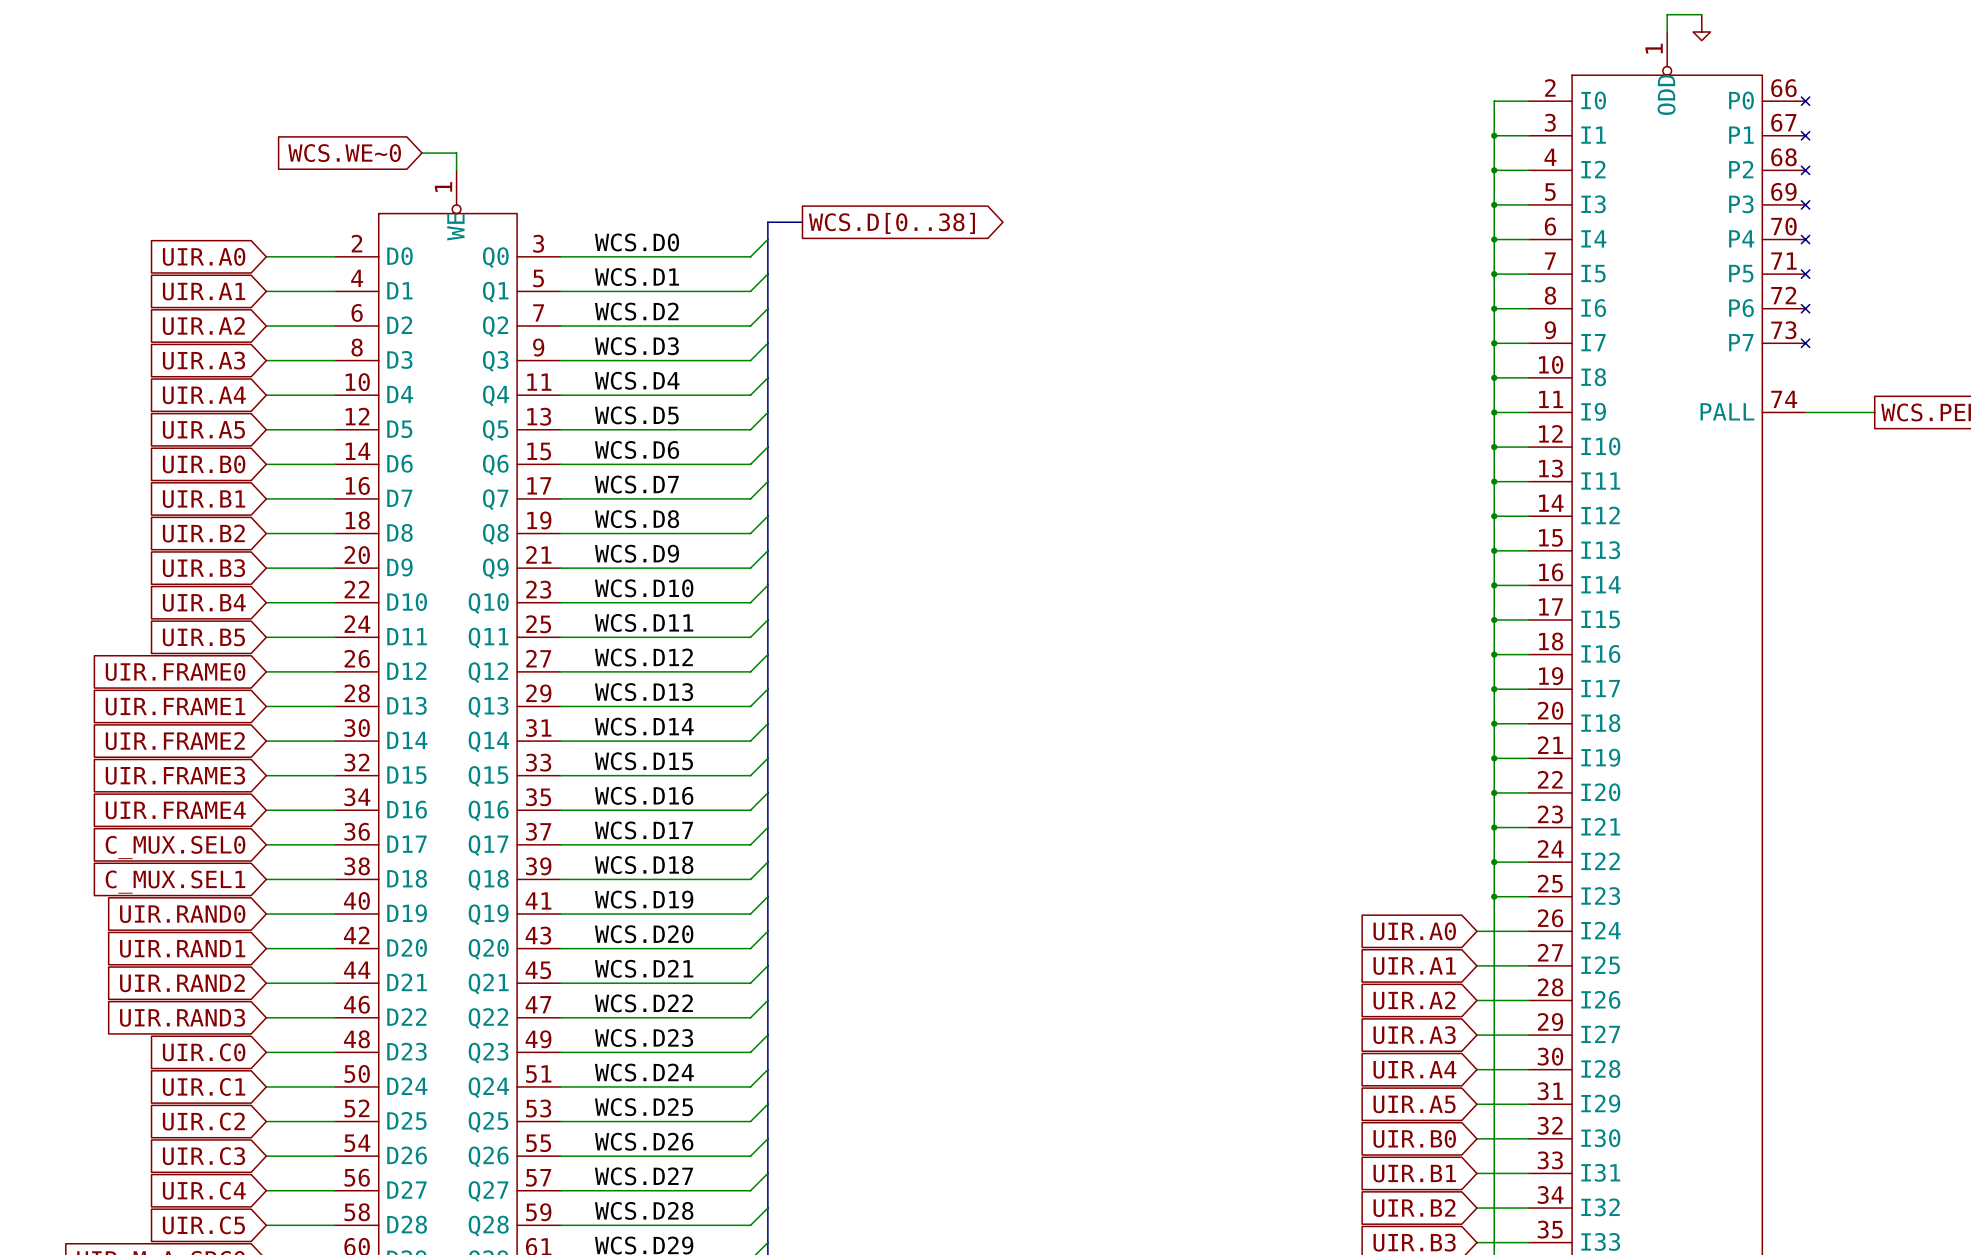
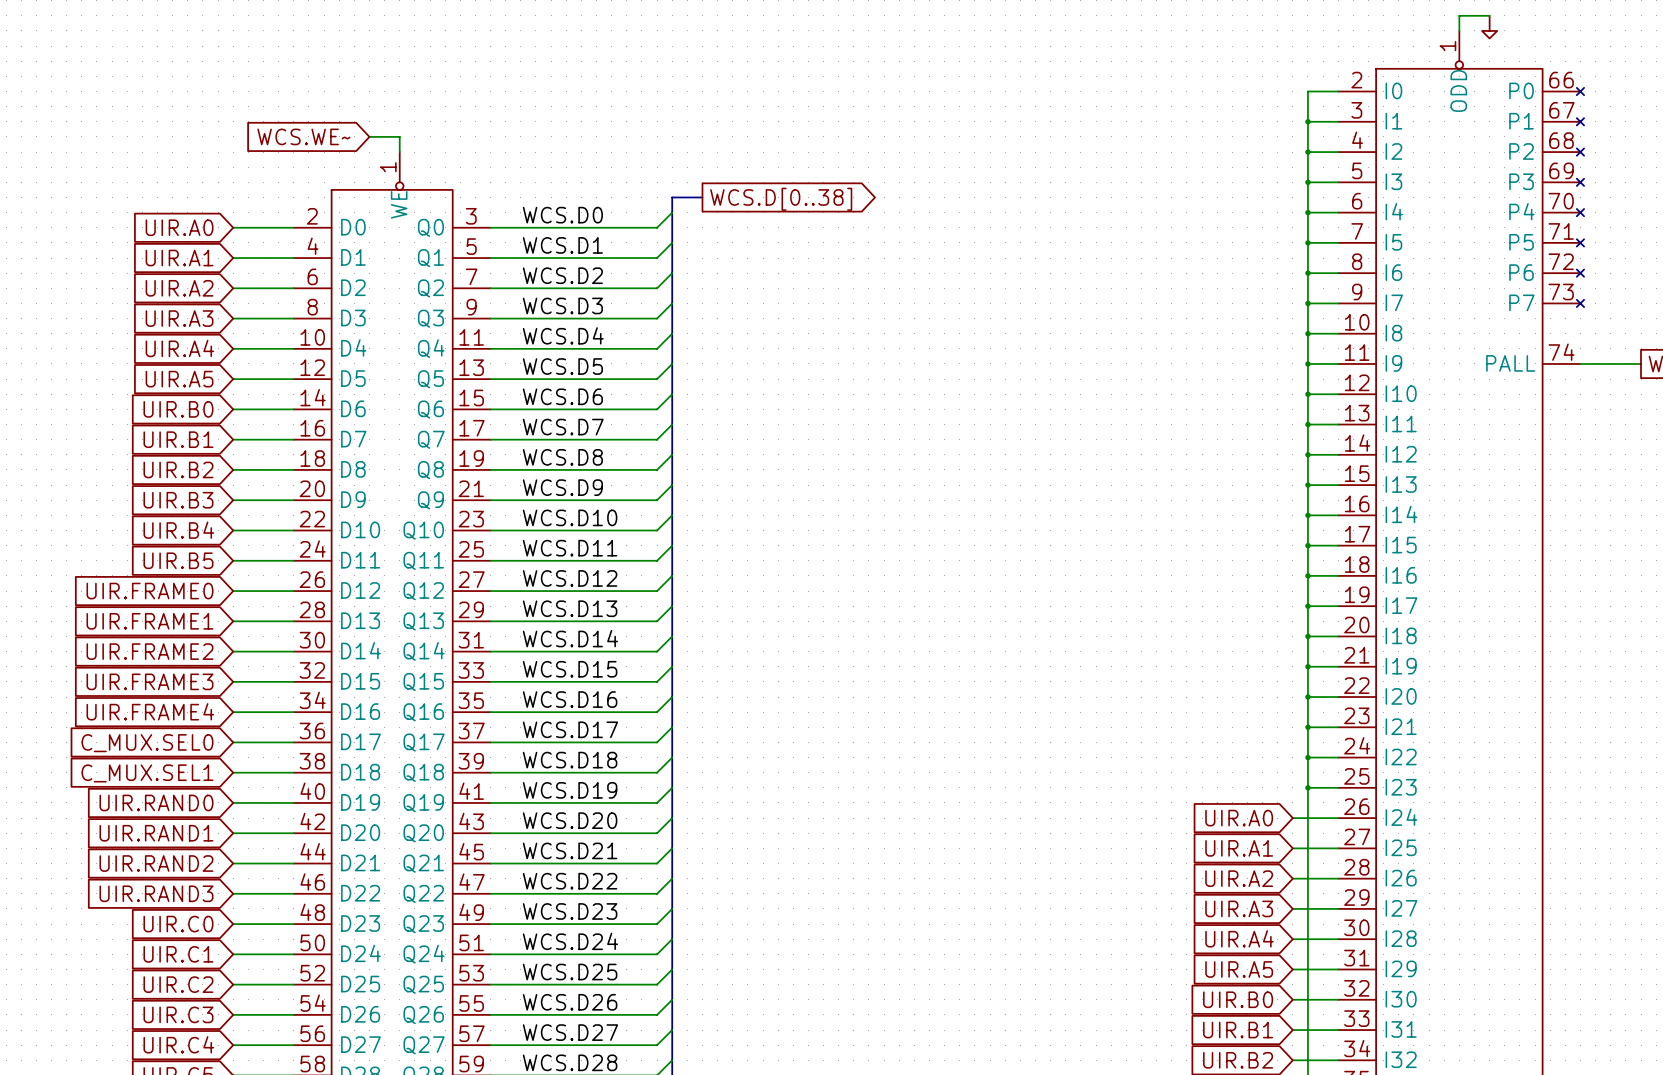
global label: WCS.WE~0 (344, 153) -> WCS.WE~ (303, 136)

